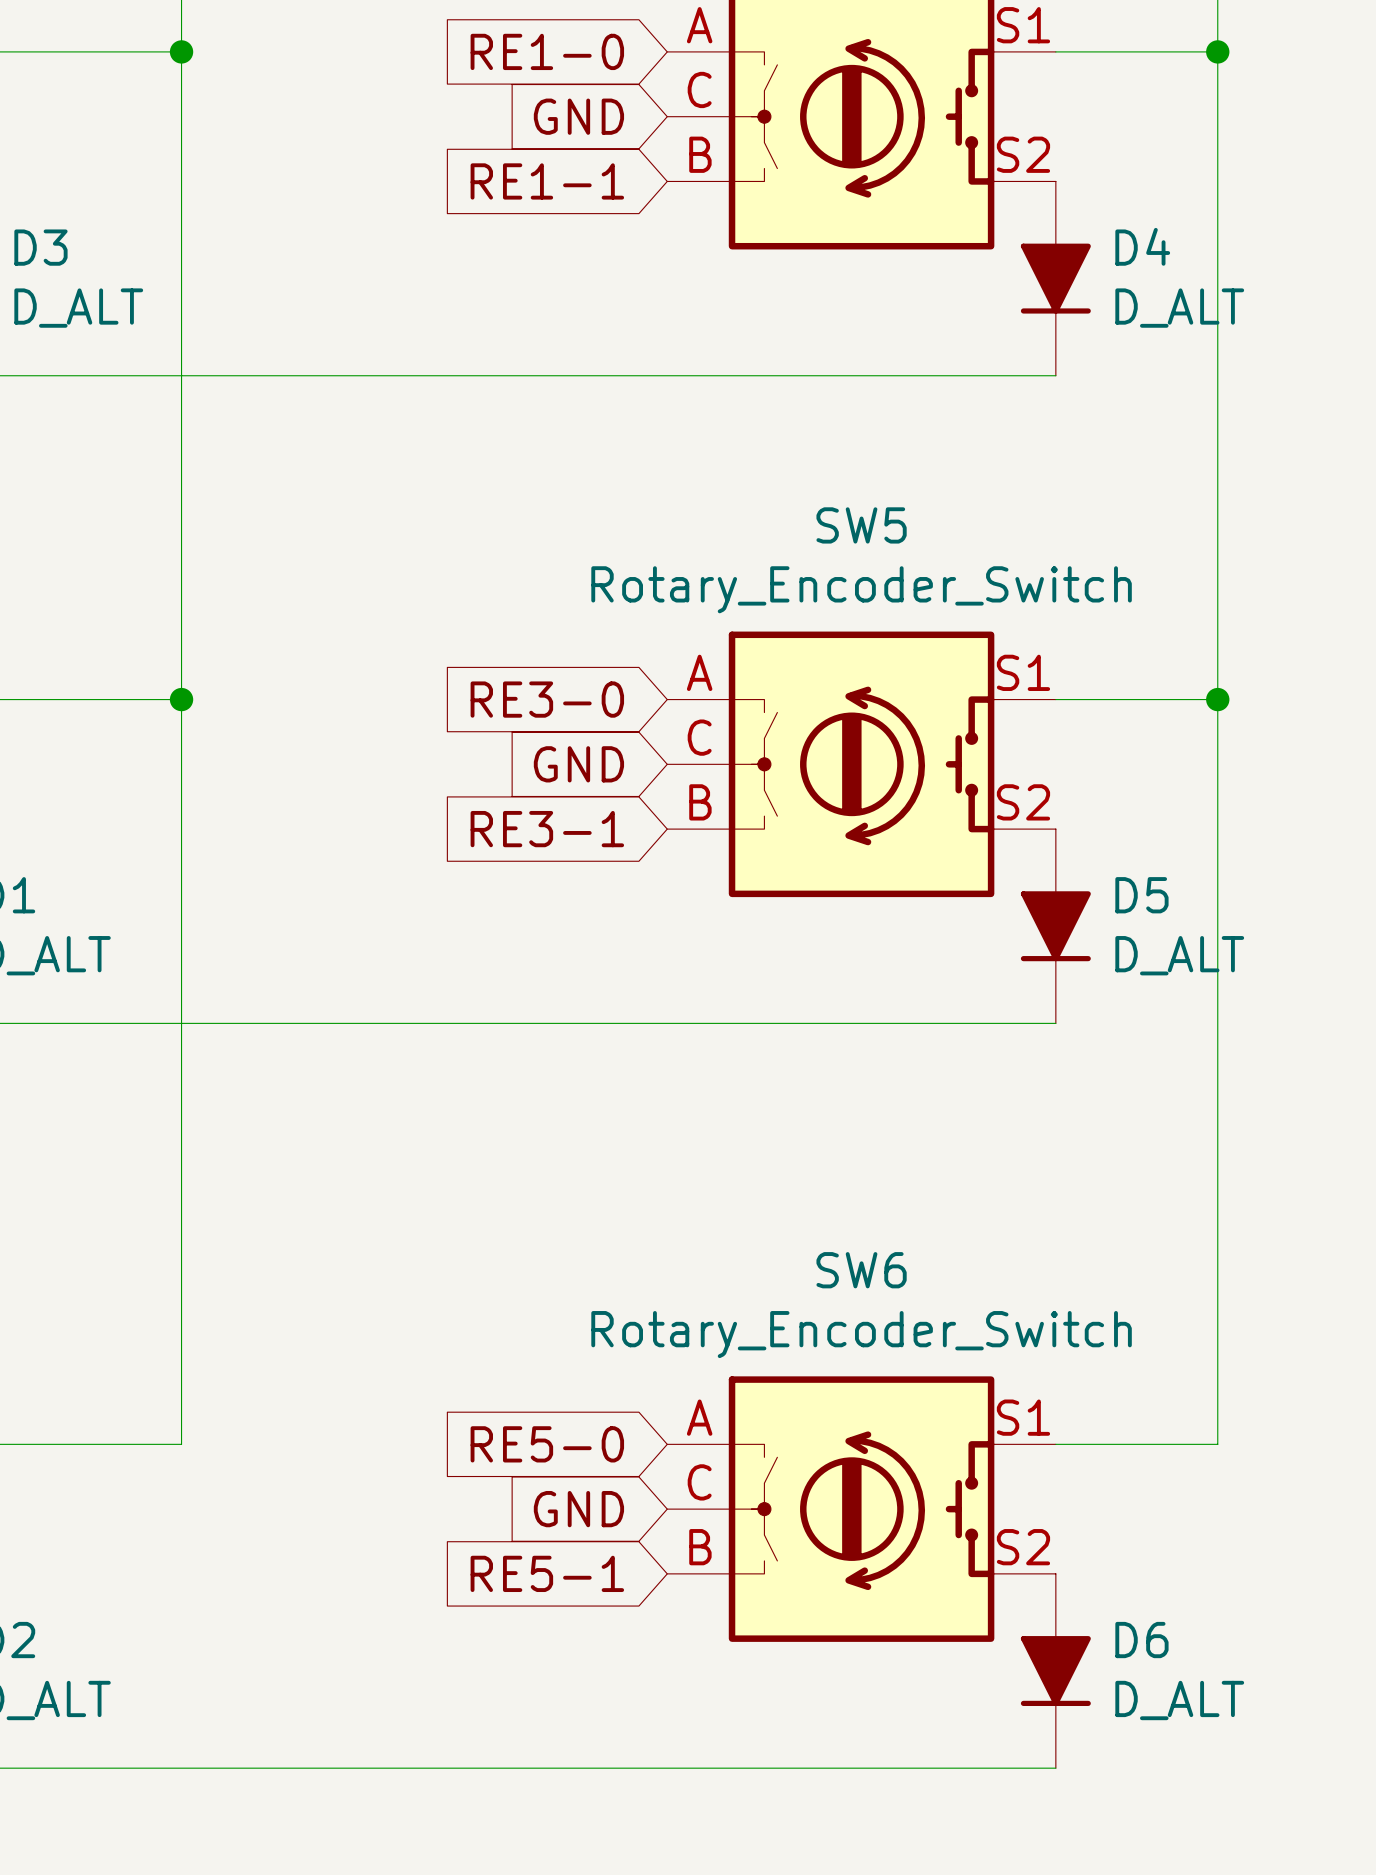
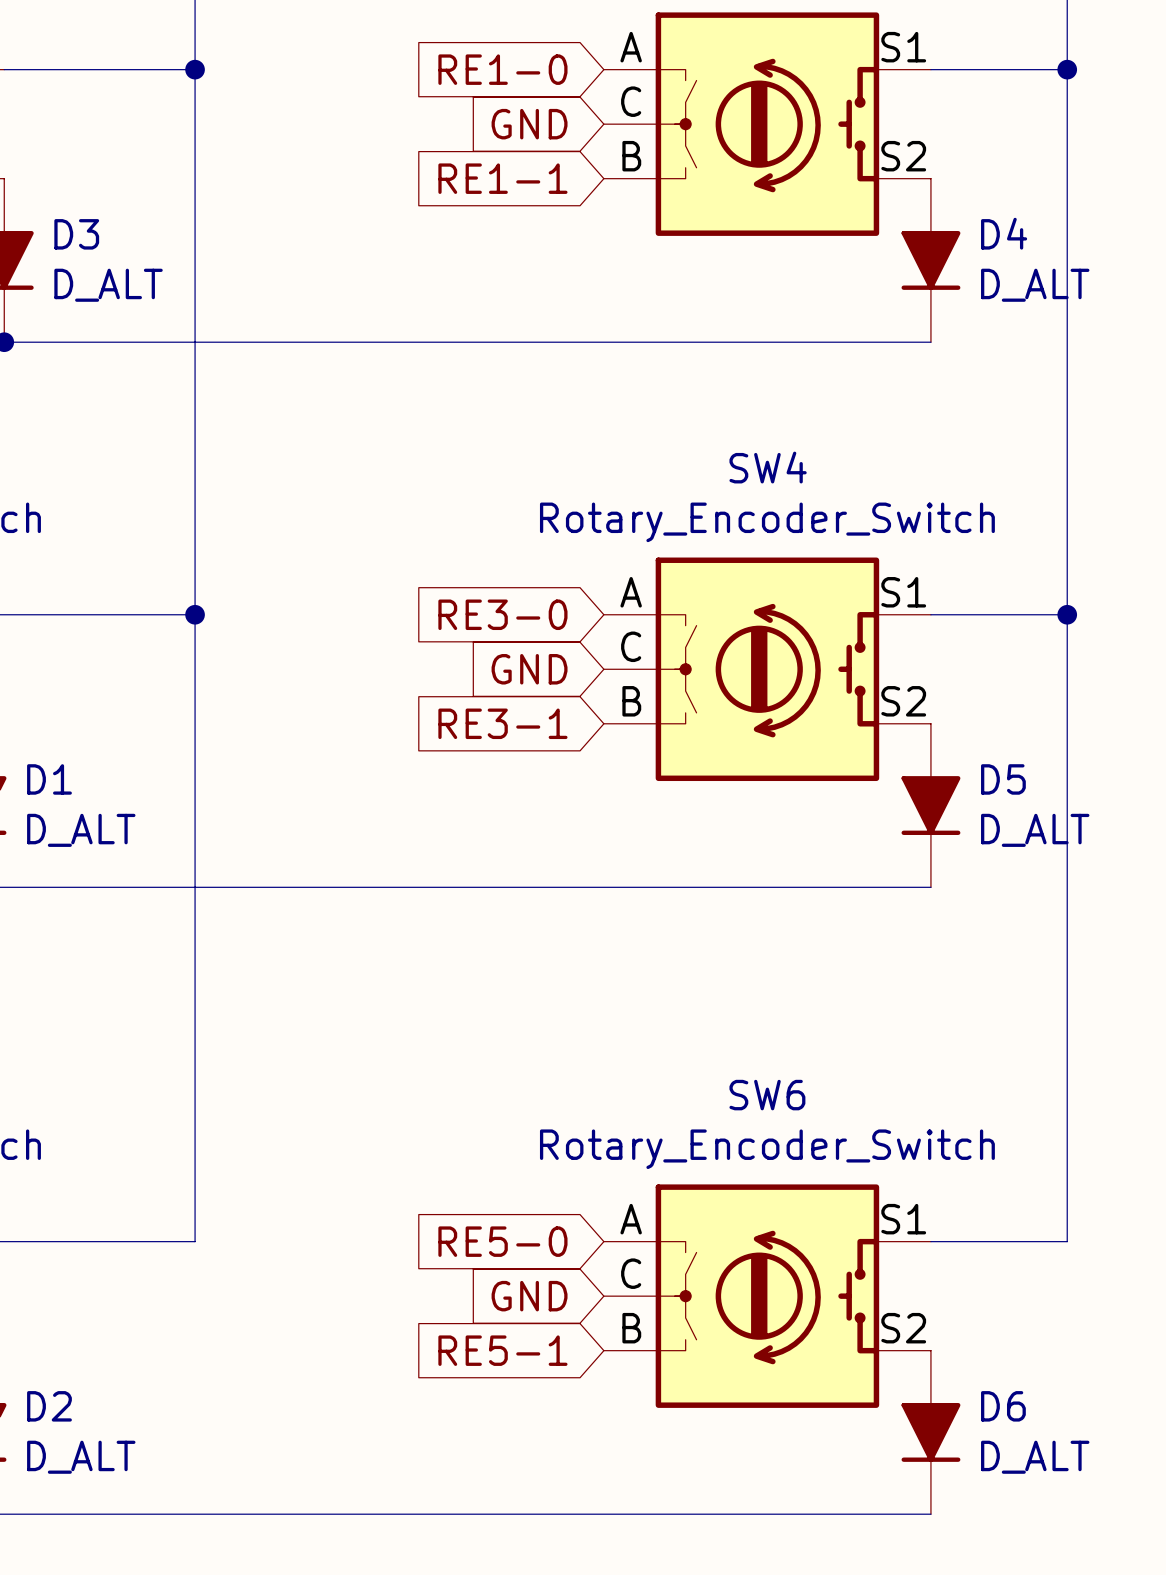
SW5 name: SW5 (861, 525) -> SW4 (768, 467)

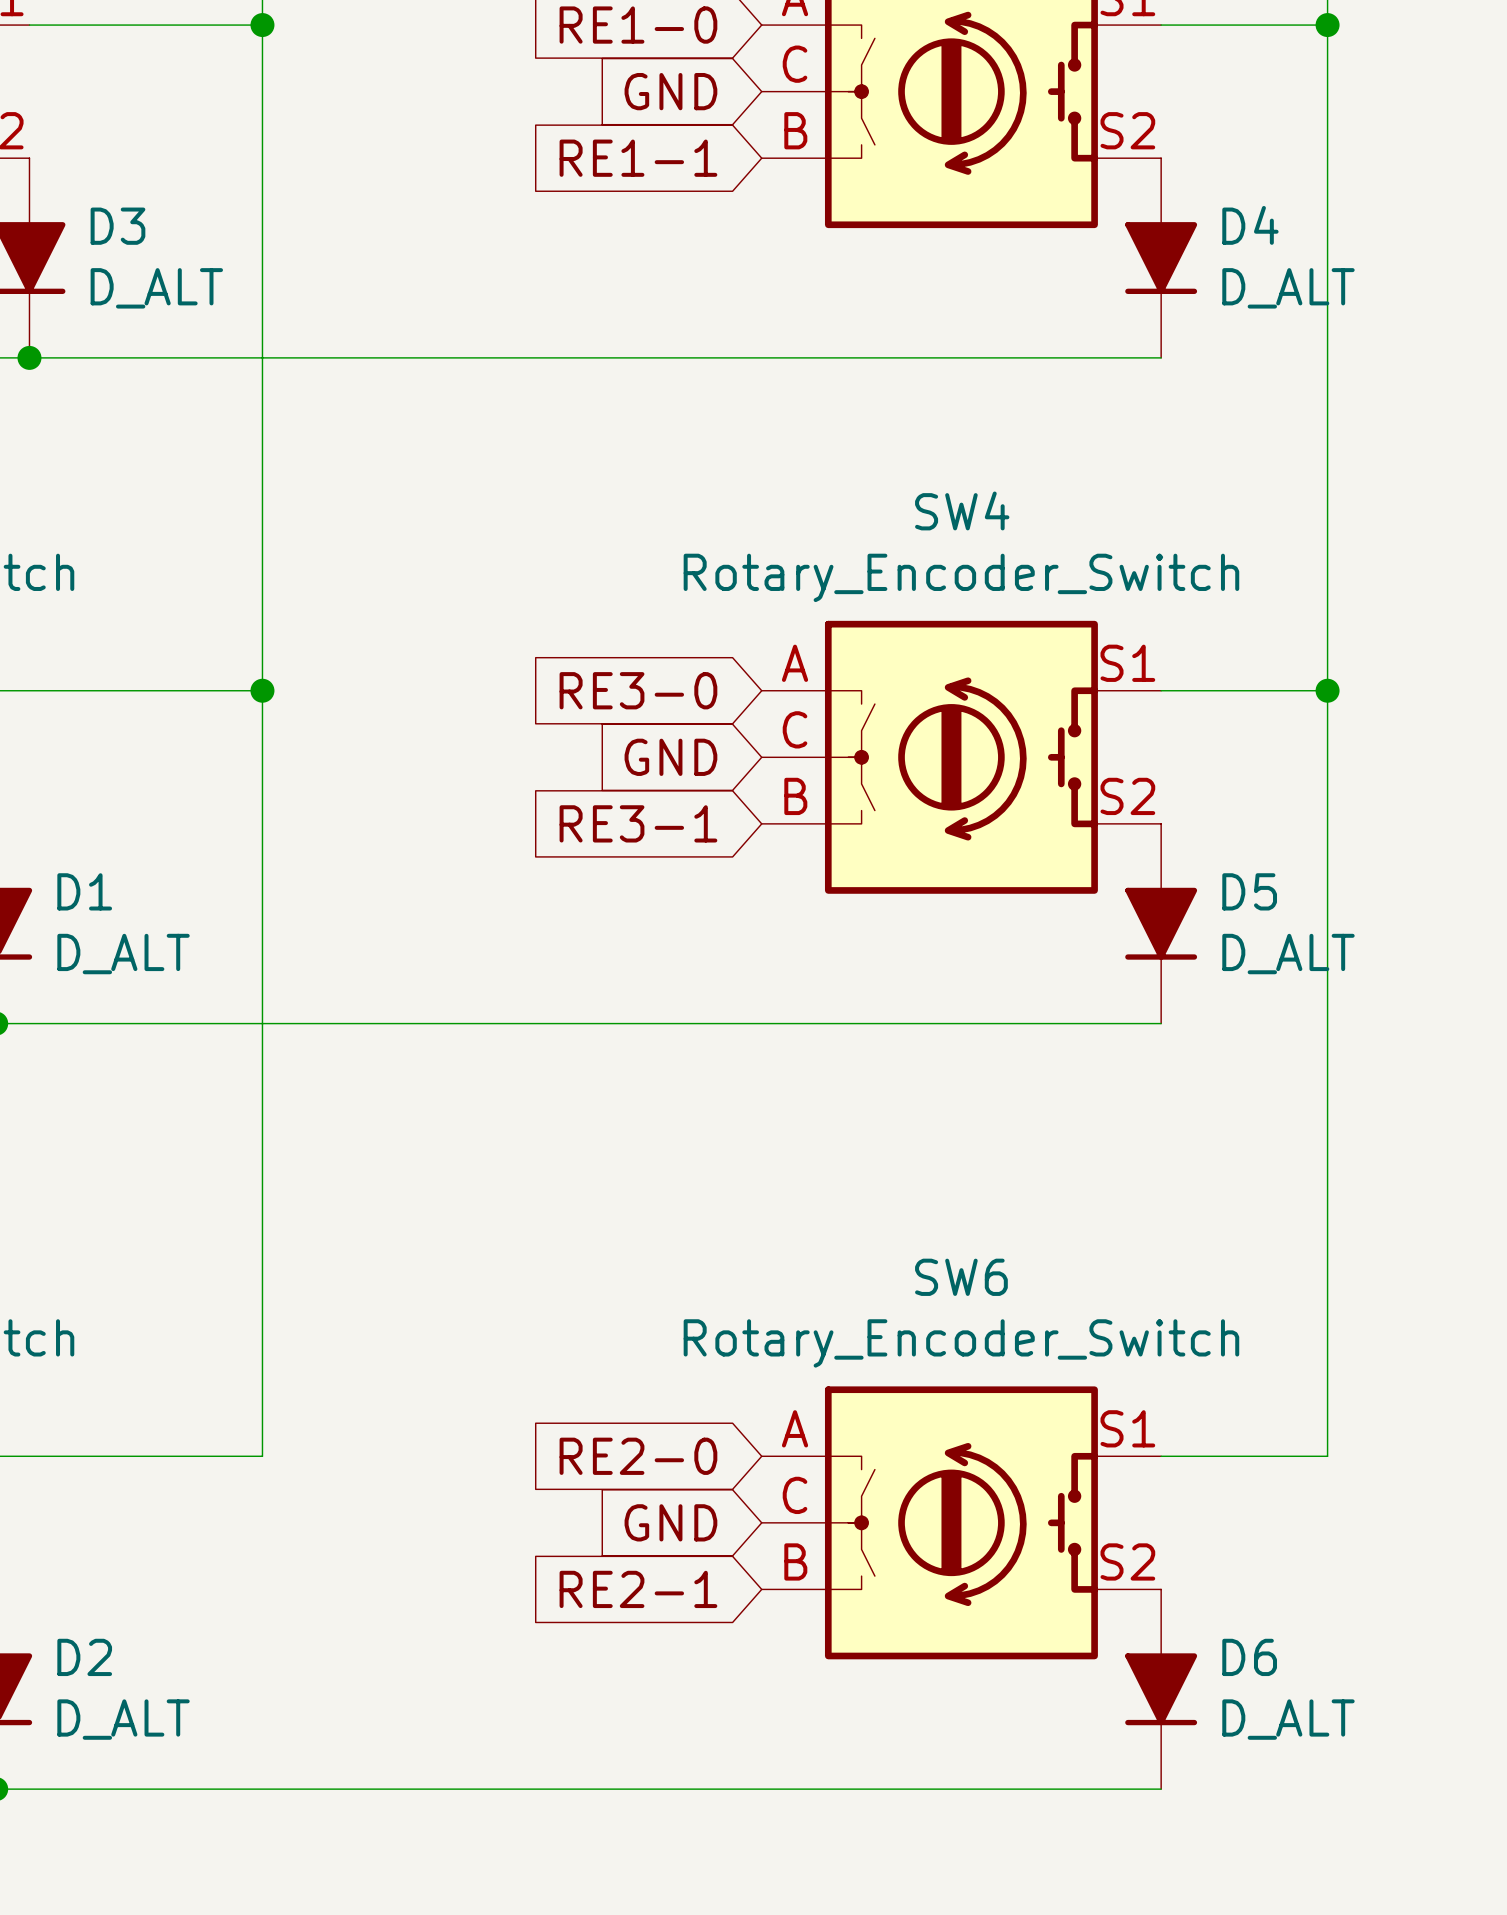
global label: RE5-0 (502, 1241) -> RE2-0 (638, 1456)
global label: RE5-1 (502, 1350) -> RE2-1 (638, 1589)

